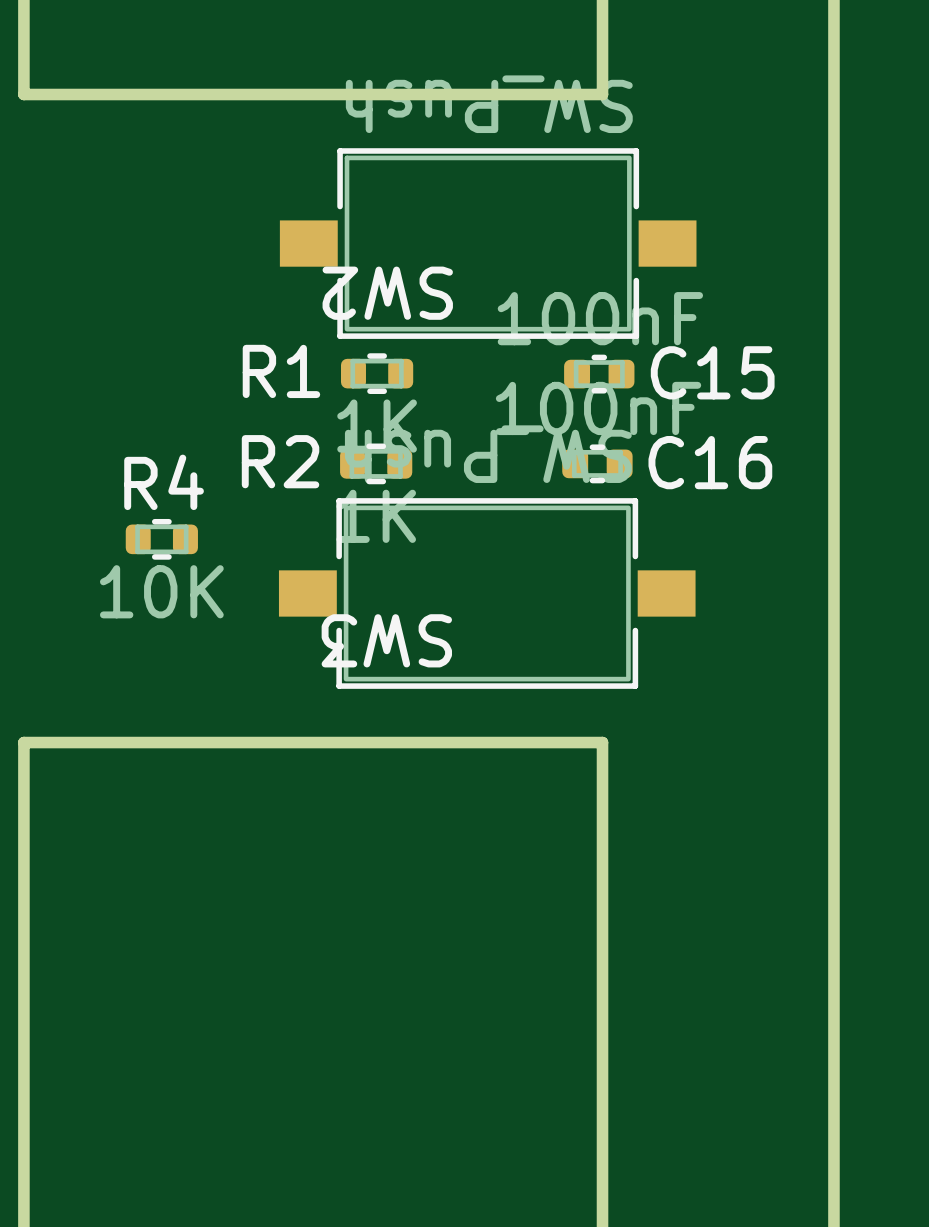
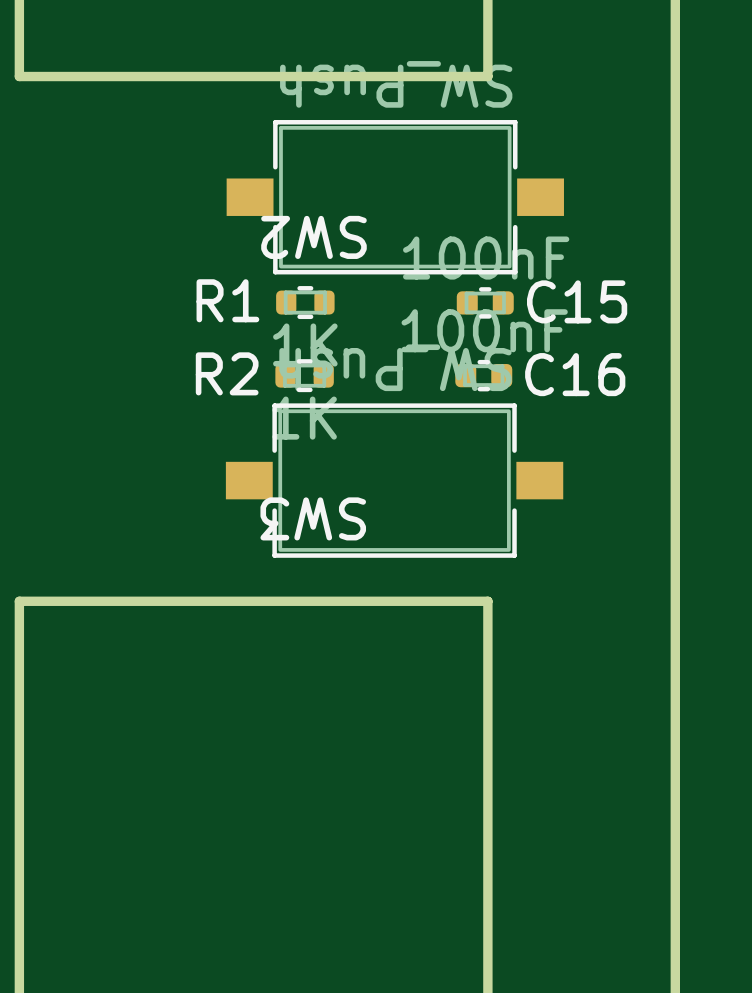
R4: 10K (161, 539) -> none

